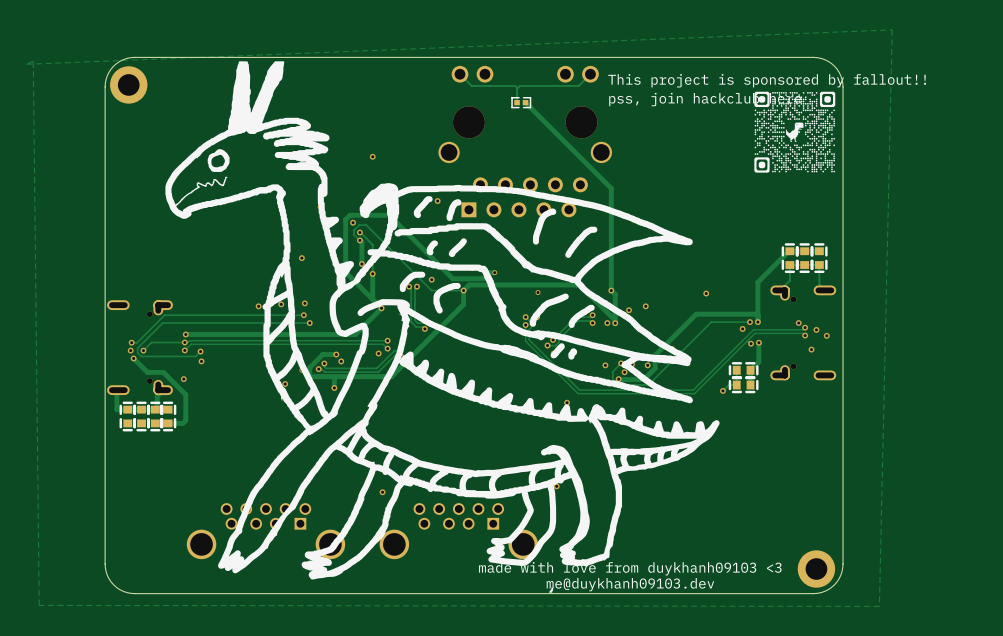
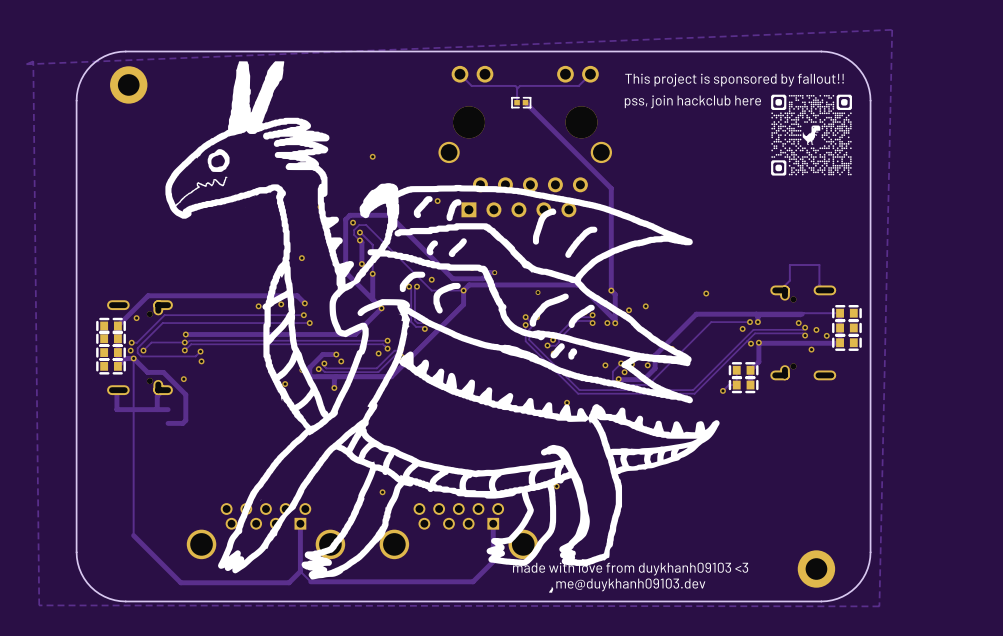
board edge: (813, 57) (134, 57) (123, 59) (116, 63) (109, 72) (105, 86) (105, 564) (107, 575) (111, 582) (123, 591) (134, 593) (813, 593) (821, 592) (831, 587) (839, 578) (843, 564) (843, 86) (840, 75) (834, 66) (824, 59) (813, 57) -> (821, 51) (842, 56) (856, 65) (865, 79) (870, 95) (870, 552) (865, 573) (852, 590) (837, 598) (821, 601) (125, 601) (104, 596) (87, 582) (79, 568) (76, 552) (76, 100) (81, 79) (95, 62) (109, 54) (125, 51) (821, 51)
text position: This project is sponsored by fallout!! (767, 80) -> This project is sponsored by fallout!! (734, 80)
text position: pss, join hackclub here (705, 99) -> pss, join hackclub here (692, 101)
drawing position: (794, 132) -> (811, 135)
track: (819, 251) (788, 251) (757, 282) (757, 316) -> none
part: (789, 258) -> none
part: (804, 258) -> none
part: (819, 258) -> none
track: none -> (304, 303) (297, 295) (148, 295) (117, 326) (117, 366) (125, 358) (133, 358) (133, 535) (180, 582) (289, 582) (300, 571)
part: none -> (846, 313)
track: none -> (802, 314) (756, 314)
track: none -> (758, 316) (800, 316) (803, 313) (840, 313) (839, 343) (759, 343)
via: none -> (136, 318)
part: none -> (111, 326)
part: none -> (846, 327)
part: none -> (111, 338)
part: none -> (846, 342)
part: none -> (111, 352)
part: none -> (111, 366)
part: (127, 416) -> none
part: (141, 416) -> none
part: (155, 416) -> none
part: (168, 416) -> none
track: none -> (300, 523) (300, 571)
track: none -> (493, 523) (493, 561) (473, 581) (310, 581) (300, 571)

